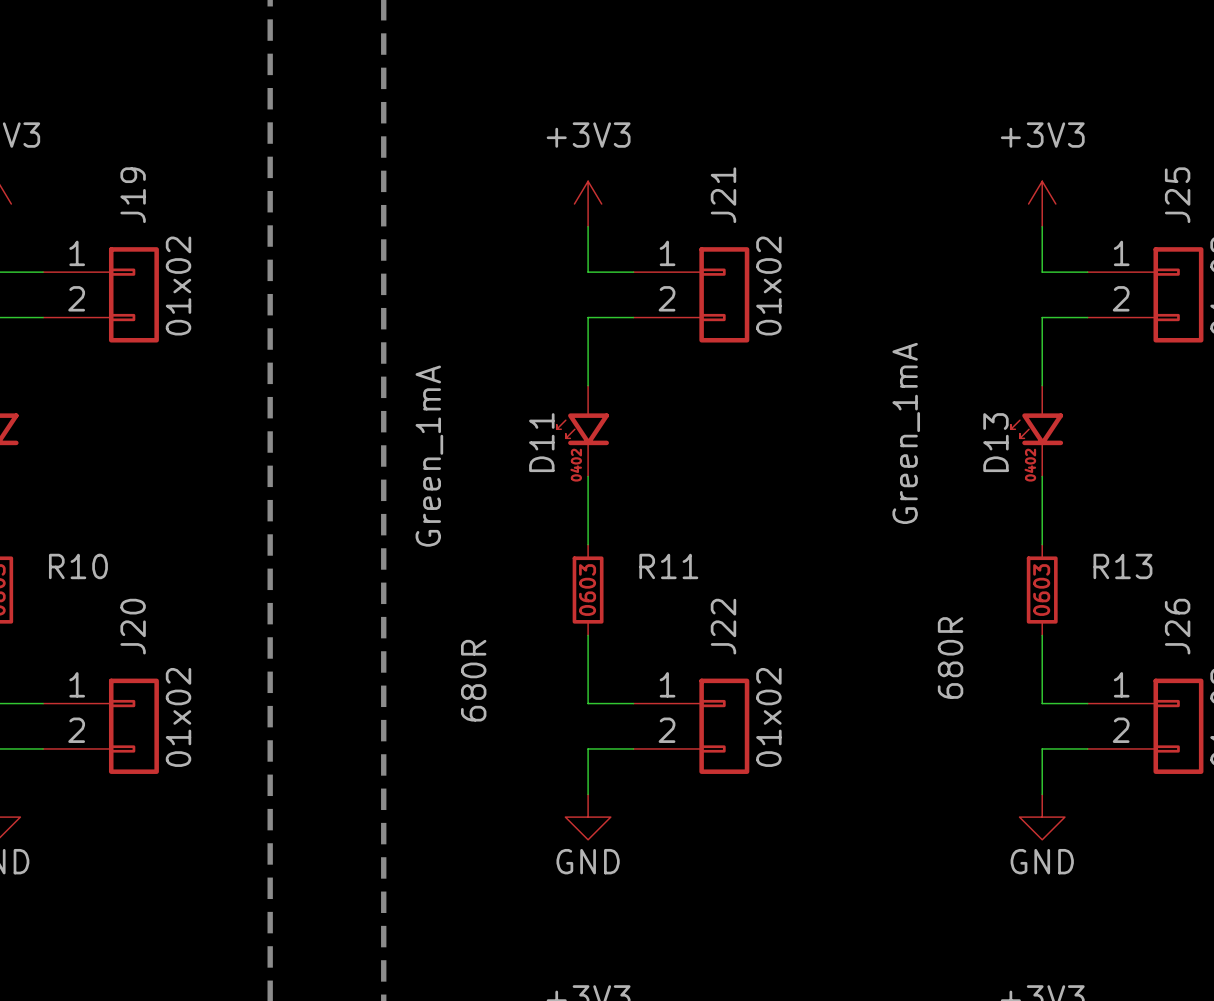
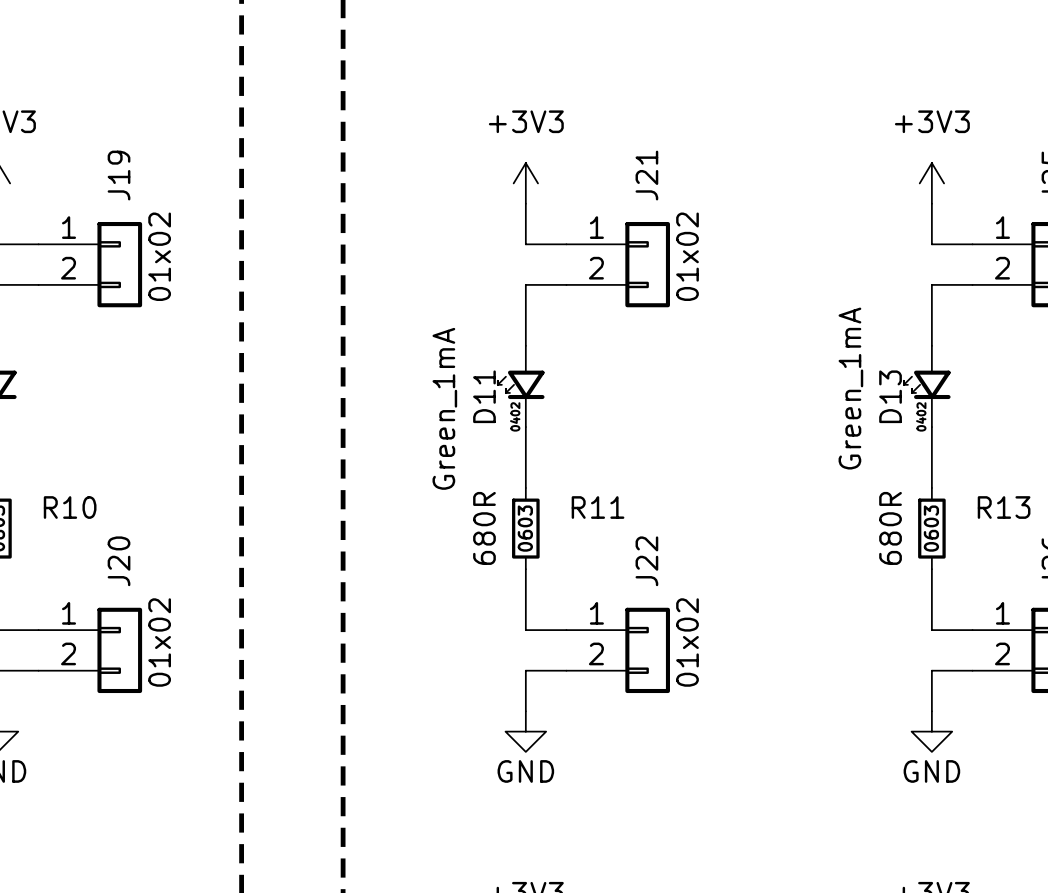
D13 value position: Green_1mA (906, 433) -> Green_1mA (850, 388)
D11 value position: Green_1mA (429, 456) -> Green_1mA (444, 408)
R13 value position: 680R (950, 657) -> 680R (890, 528)
R11 value position: 680R (473, 680) -> 680R (484, 528)

